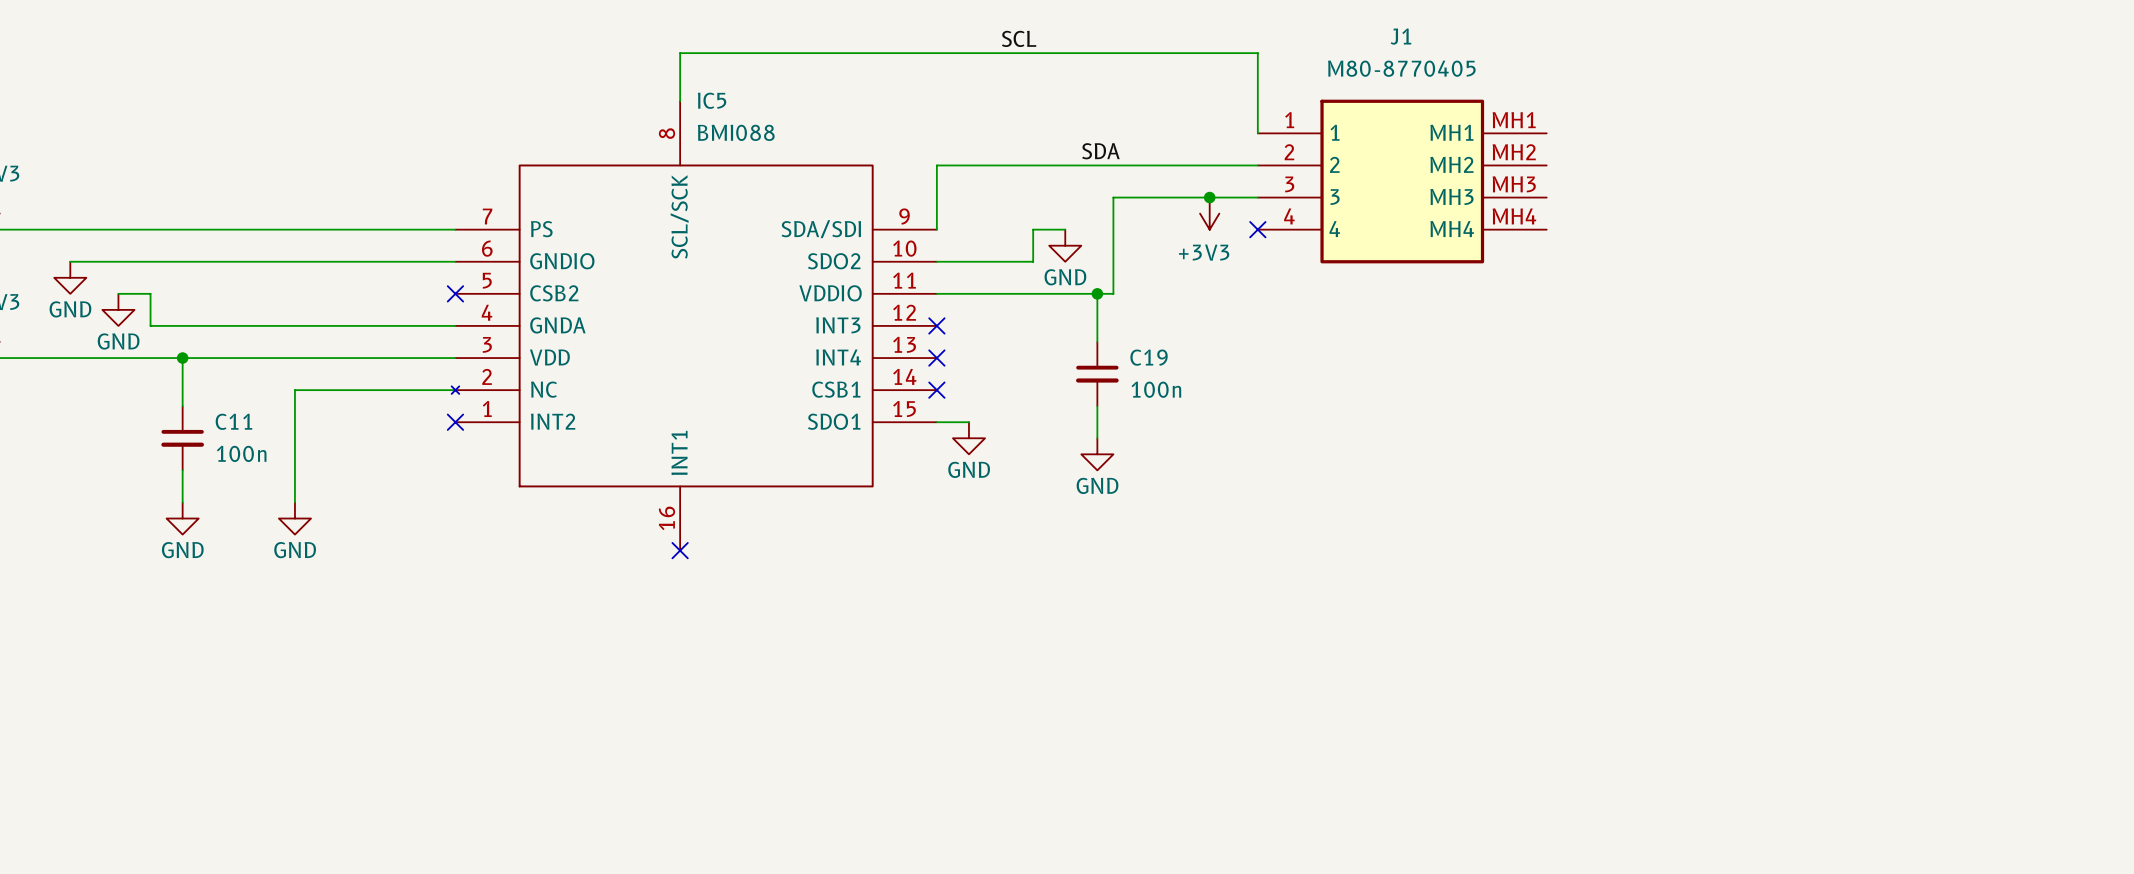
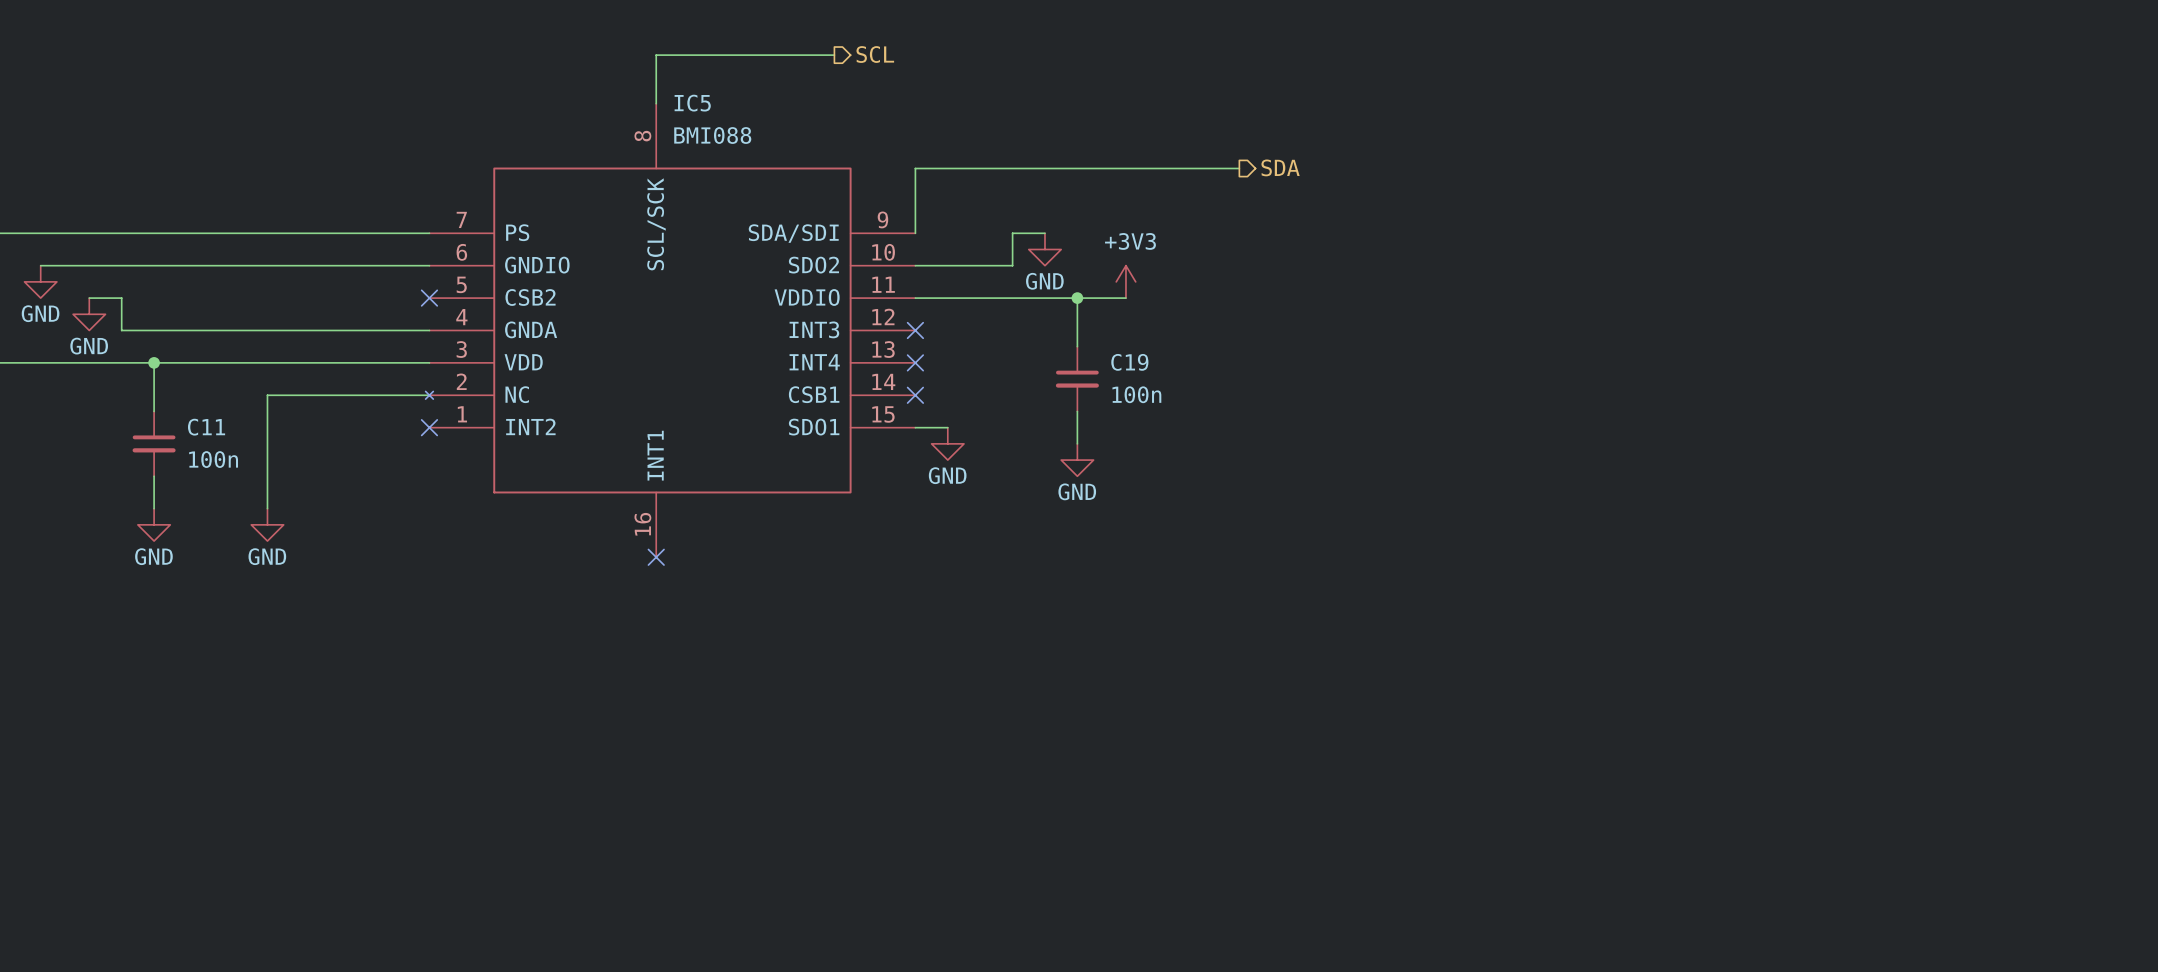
label: SCL (1019, 38) -> none
hierarchical label: none -> SCL (875, 54)
wire: (856, 53) (1257, 53) (1257, 133) -> none
label: SDA (1100, 151) -> none
hierarchical label: none -> SDA (1280, 167)
J1: M80-8770405 (1402, 181) -> none
junction: (1209, 197) -> none
wire: (1257, 197) (1113, 197) (1113, 293) -> (1125, 298) (1093, 298)
power symbol rotation: 0° (1209, 213) -> 180° (1125, 281)
power symbol position: +3V3 (1209, 213) -> +3V3 (1125, 281)
no-connect mark: (1257, 229) -> none

